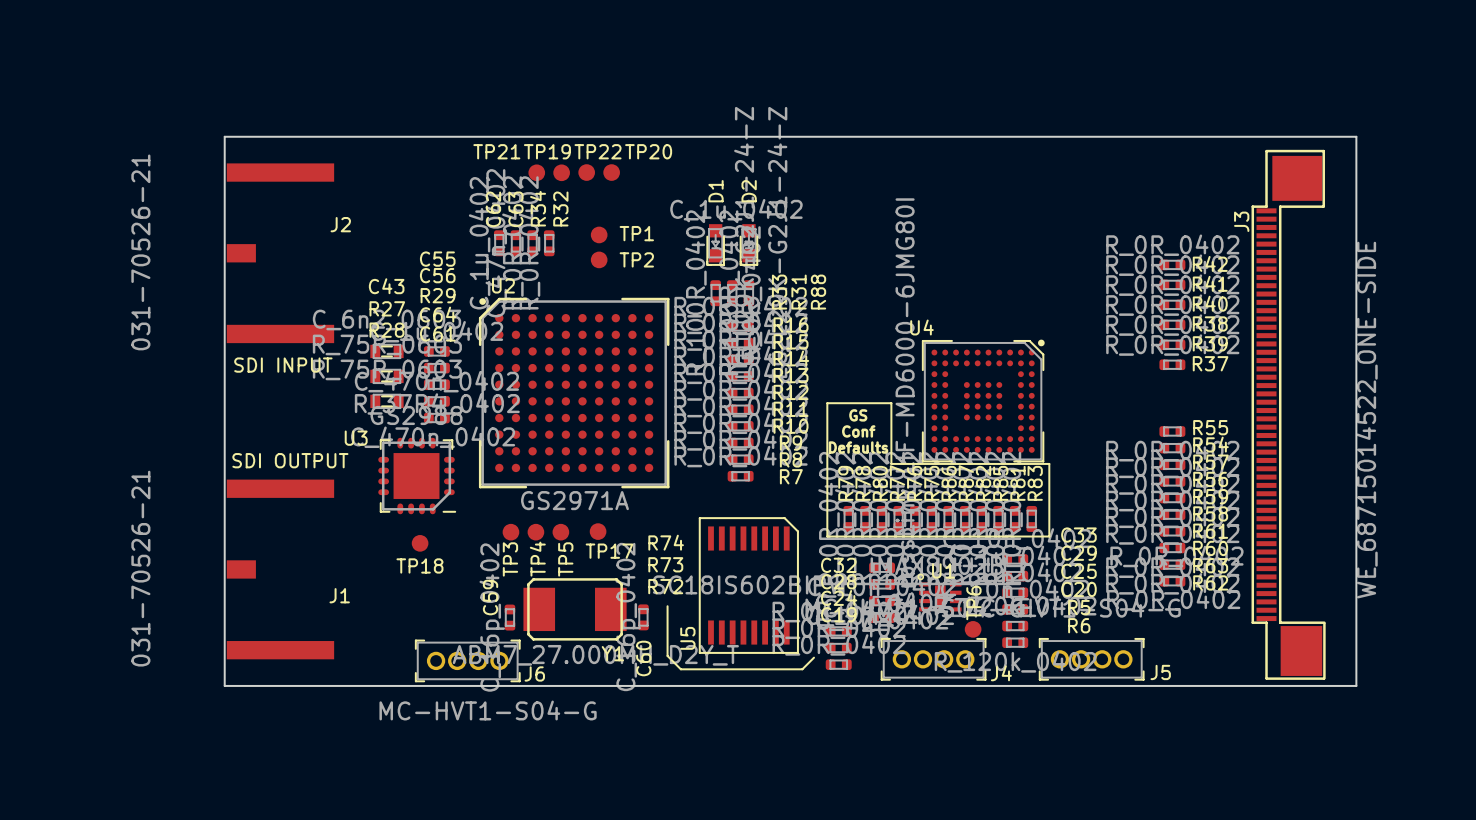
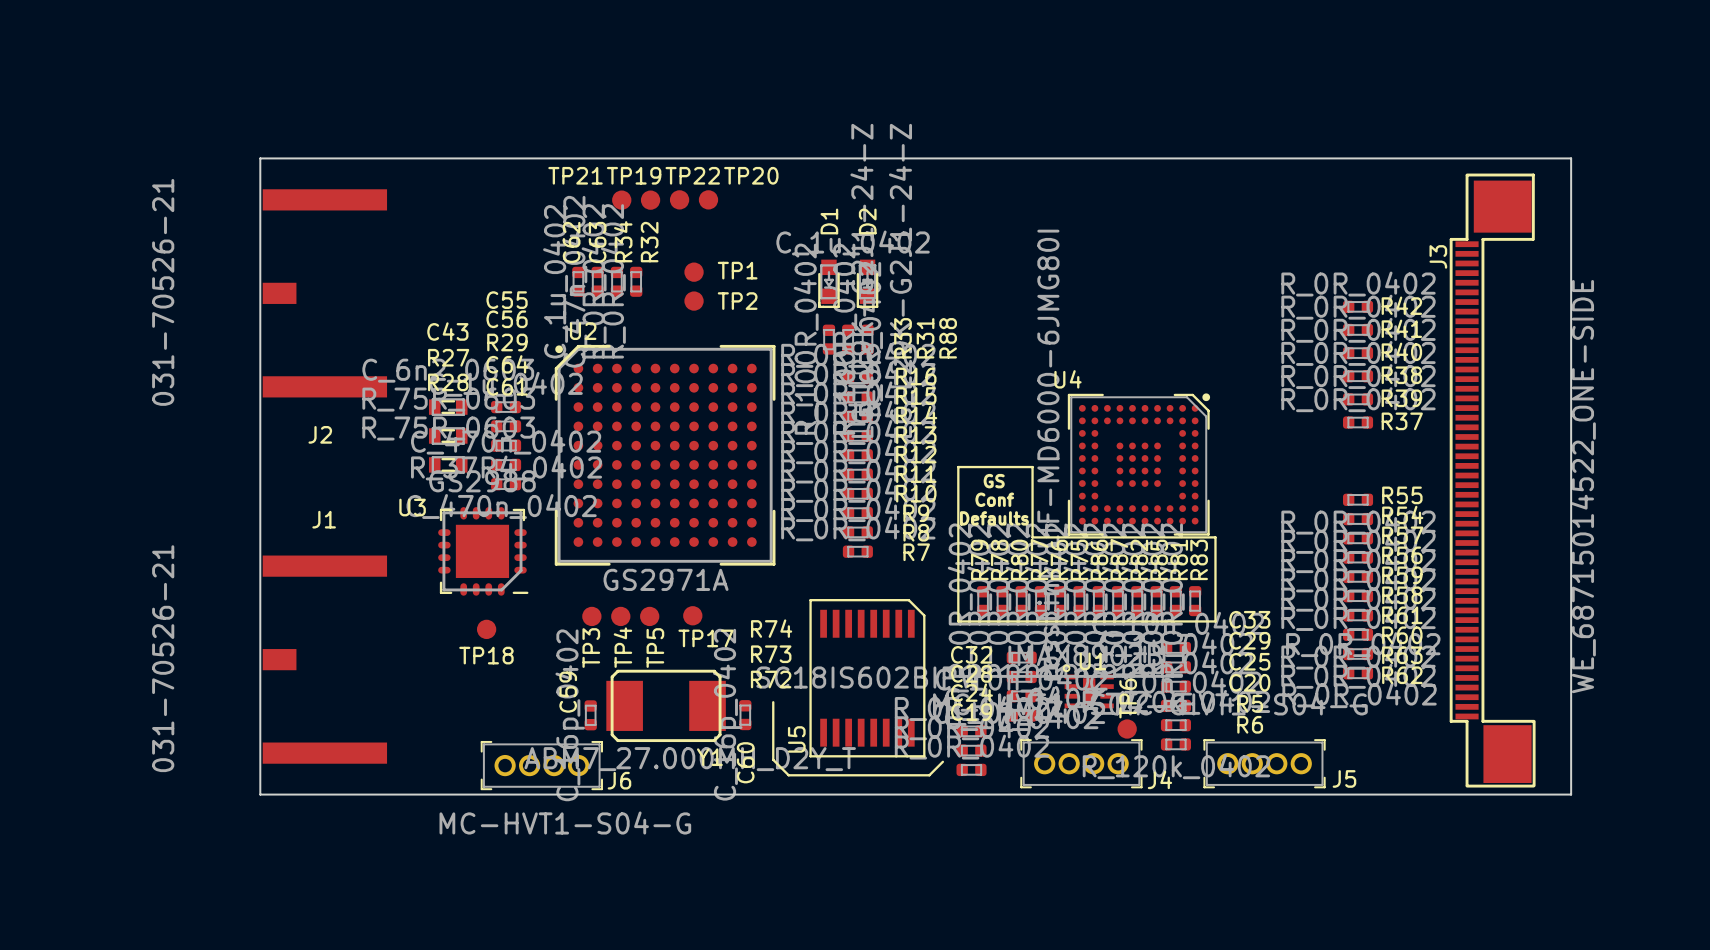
J2 name position: J2 (340, 224) -> J2 (320, 434)
text: SDI INPUT (283, 365) -> none
text: SDI OUTPUT (290, 460) -> none
J1 name position: J1 (339, 595) -> J1 (324, 519)

